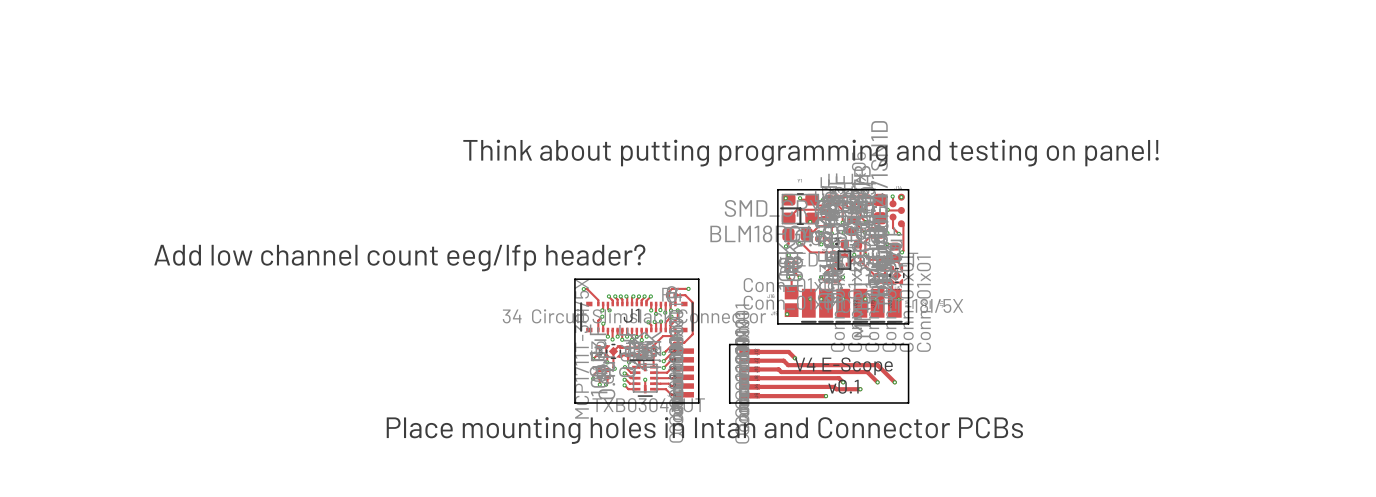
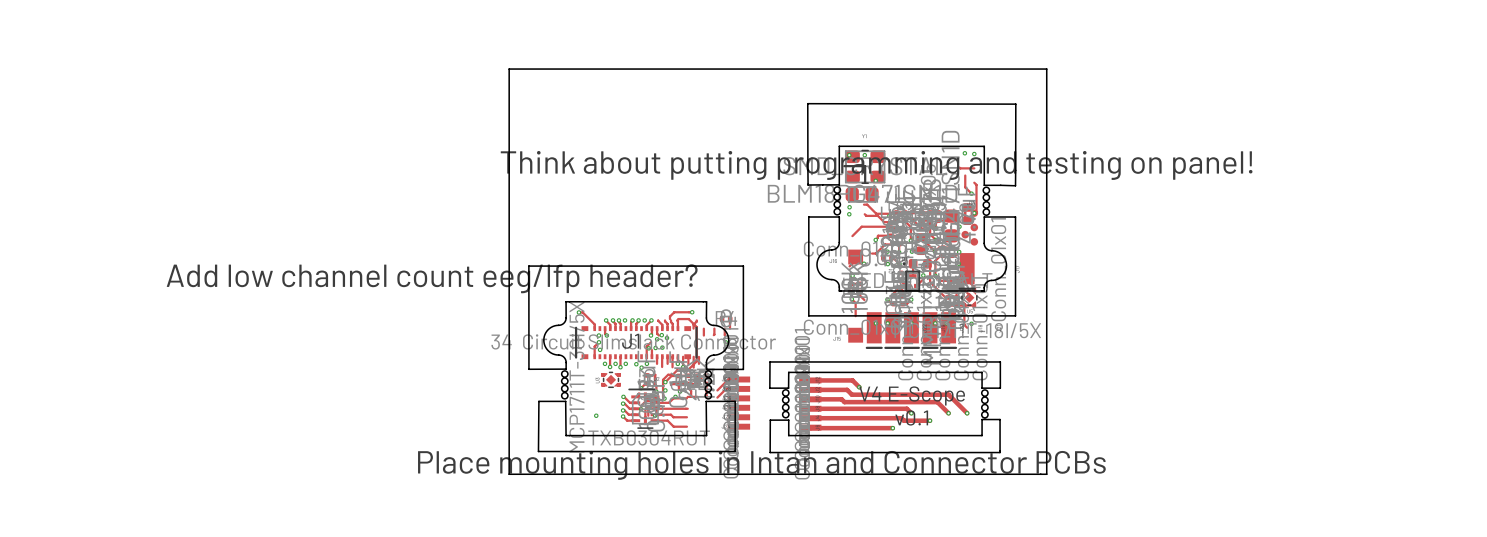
board edge: none -> (509, 69) (509, 474) (1046, 474) (1046, 69) (509, 69)
board edge: none -> (807, 103) (1015, 104) (1015, 185) (984, 185) (984, 146) (839, 146) (839, 184) (808, 185) (807, 103)
via: none -> (964, 153)
via: none -> (974, 154)
via: none -> (849, 155)
via: none -> (864, 155)
via: none -> (875, 180)
round board edge: none -> [834, 186, 841, 194]
round board edge: none -> [983, 187, 990, 194]
round board edge: none -> [834, 193, 841, 201]
round board edge: none -> [983, 194, 990, 201]
round board edge: none -> [834, 201, 841, 208]
round board edge: none -> [983, 201, 990, 209]
board edge: (777, 189) (777, 323) (908, 323) (908, 189) (777, 189) -> (808, 217) (808, 315) (1015, 315) (1015, 217) (984, 217) (984, 246) (987, 249) (1002, 255) (1006, 265) (1004, 273) (1000, 277) (985, 283) (984, 290) (839, 290) (837, 282) (822, 276) (818, 270) (816, 264) (821, 254) (835, 248) (838, 245) (839, 217) (808, 217)
round board edge: none -> [834, 208, 841, 215]
round board edge: none -> [983, 208, 990, 216]
via position: (892, 196) -> (971, 193)
via position: (800, 198) -> (849, 207)
part position: (799, 209) -> (864, 166)
track: (887, 209) (901, 210) -> (959, 167) (974, 168)
track: (893, 217) (893, 228) (898, 233) -> (965, 175) (965, 187) (971, 193)
track: (901, 223) (903, 225) (902, 252) -> (974, 182) (976, 184) (974, 213)
via: (898, 233) -> none
part position: (797, 234) -> (862, 194)
track: (799, 244) (802, 244) (810, 252) (833, 252) -> (864, 204) (867, 204) (876, 213) (901, 213)
via: (786, 246) -> none
part position: (895, 252) -> (967, 214)
via: (902, 252) -> none
via: (799, 277) -> none
board edge: (574, 279) (574, 402) -> (621, 301) (566, 301) (565, 321) (549, 328) (544, 334) (543, 340) (544, 345) (549, 351) (564, 357) (566, 369) (528, 369) (528, 266) (743, 266) (743, 369) (706, 369) (707, 358) (722, 352) (727, 345) (728, 340) (727, 334) (722, 328) (707, 321) (706, 301)
board edge: (653, 279) (698, 279) (698, 402) (653, 402) -> (621, 435) (566, 435) (565, 401) (538, 401) (538, 451) (735, 451) (735, 401) (706, 401) (706, 435)
via: none -> (692, 312)
track: (688, 288) (671, 288) (667, 295) -> (692, 312) (674, 312) (669, 319)
via: (688, 288) -> none
track: none -> (578, 312) (582, 312) (594, 324) (594, 328)
via: none -> (578, 312)
track: (583, 289) (587, 289) (598, 300) -> (651, 320) (646, 325)
via: (583, 289) -> none
part position: (791, 292) -> (855, 257)
track: (675, 295) (685, 295) (692, 302) (692, 334) (684, 342) (674, 342) (663, 353) -> (678, 319) (688, 319) (696, 327) (696, 361) (687, 370) (677, 370) (665, 382)
track: none -> (606, 320) (610, 324) (610, 328)
via: none -> (606, 320)
track: none -> (613, 320) (615, 328)
via: none -> (613, 320)
track: none -> (618, 320) (620, 328)
via: none -> (618, 320)
via: none -> (625, 320)
via: none -> (632, 320)
via: none -> (638, 320)
via: none -> (644, 320)
via: none -> (651, 320)
via: (608, 296) -> none
via: (615, 296) -> none
via: (620, 296) -> none
via: (626, 296) -> none
track: (633, 296) (632, 304) -> (632, 320) (631, 328)
via: (633, 296) -> none
track: (638, 296) (636, 304) -> (638, 320) (636, 328)
via: (638, 296) -> none
via: (644, 296) -> none
track: (650, 296) (646, 300) (646, 304) -> none
via: (650, 296) -> none
track: none -> (605, 328) (606, 335)
track: (656, 304) (656, 313) -> none
track: (665, 304) (665, 312) -> none
part position: (894, 305) -> (967, 271)
via: none -> (598, 335)
via: none -> (606, 335)
via: (609, 310) -> none
via: none -> (661, 335)
via: (651, 310) -> none
via: (660, 310) -> none
via: (671, 310) -> none
track: (677, 310) (677, 318) (670, 325) (670, 330) -> none
via: (677, 310) -> none
via: none -> (667, 338)
via: (665, 312) -> none
via: none -> (657, 339)
via: (656, 313) -> none
via: (787, 314) -> none
track: none -> (598, 342) (594, 346) (594, 356)
via: none -> (598, 342)
via: (602, 316) -> none
track: (671, 316) (665, 322) (665, 330) -> none
J1 position: (636, 317) -> (636, 342)
via: none -> (655, 347)
via: none -> (662, 347)
track: (654, 321) (656, 330) -> none
via: (654, 321) -> none
track: (660, 321) (660, 330) -> none
via: (660, 321) -> none
via: none -> (648, 348)
track: (648, 322) (651, 325) (651, 330) -> none
via: (648, 322) -> none
via: none -> (600, 349)
via: (603, 323) -> none
track: none -> (610, 356) (610, 366)
track: none -> (620, 356) (620, 367)
track: (675, 330) (675, 336) (663, 336) (653, 347) -> none
via: none -> (604, 363)
via: none -> (615, 363)
via: none -> (625, 363)
via: none -> (636, 364)
via: none -> (646, 363)
via: (607, 336) -> none
via: (617, 336) -> none
via: (636, 336) -> none
via: (646, 336) -> none
via: none -> (610, 366)
via: none -> (620, 367)
via: (612, 339) -> none
via: (622, 339) -> none
via: none -> (641, 367)
via: (641, 340) -> none
round board edge: none -> [561, 370, 568, 378]
round board edge: none -> [705, 370, 712, 378]
board edge: (729, 344) (729, 388) -> (788, 372) (788, 388) (769, 388) (770, 361) (1000, 361) (1000, 388) (982, 388)
round board edge: none -> [561, 377, 568, 385]
round board edge: none -> [705, 377, 712, 385]
part position: (613, 351) -> (611, 379)
via: none -> (665, 382)
via: (663, 353) -> none
round board edge: none -> [561, 385, 568, 392]
round board edge: none -> [705, 385, 712, 392]
board edge: (908, 359) (908, 388) -> (788, 420) (770, 420) (770, 452) (1000, 452) (1000, 419) (982, 419)
round board edge: none -> [782, 389, 789, 397]
round board edge: none -> [981, 389, 989, 397]
via: none -> (665, 390)
via: (663, 361) -> none
round board edge: none -> [561, 392, 568, 399]
round board edge: none -> [705, 392, 712, 399]
via: none -> (623, 396)
track: (624, 367) (631, 372) (636, 372) -> (623, 396) (630, 402) (635, 402)
via: (663, 367) -> none
round board edge: none -> [782, 396, 789, 404]
round board edge: none -> [981, 397, 989, 404]
track: (683, 368) (671, 368) (667, 372) (654, 372) -> (686, 398) (673, 398) (669, 402) (655, 402)
track: none -> (623, 403) (629, 408) (635, 408)
via: none -> (623, 403)
track: (624, 373) (630, 378) -> (655, 408) (681, 408)
via: (624, 373) -> none
round board edge: none -> [782, 404, 789, 411]
round board edge: none -> [981, 404, 989, 411]
track: (683, 377) (654, 378) -> none
part position: (643, 378) -> (643, 408)
via: none -> (623, 410)
track: (624, 379) (629, 383) (636, 383) -> (623, 410) (628, 414) (635, 414)
via: (624, 379) -> none
via: (645, 379) -> none
round board edge: none -> [782, 411, 789, 418]
round board edge: none -> [981, 411, 989, 418]
track: (654, 383) (683, 386) -> (655, 414) (686, 417)
via: none -> (596, 415)
via: (599, 384) -> none
via: none -> (623, 416)
track: (624, 385) (628, 389) (636, 389) -> (623, 416) (627, 420) (635, 420)
via: (624, 385) -> none
track: (654, 389) (665, 389) (671, 394) (683, 394) -> (655, 420) (667, 420) (673, 426) (686, 426)

